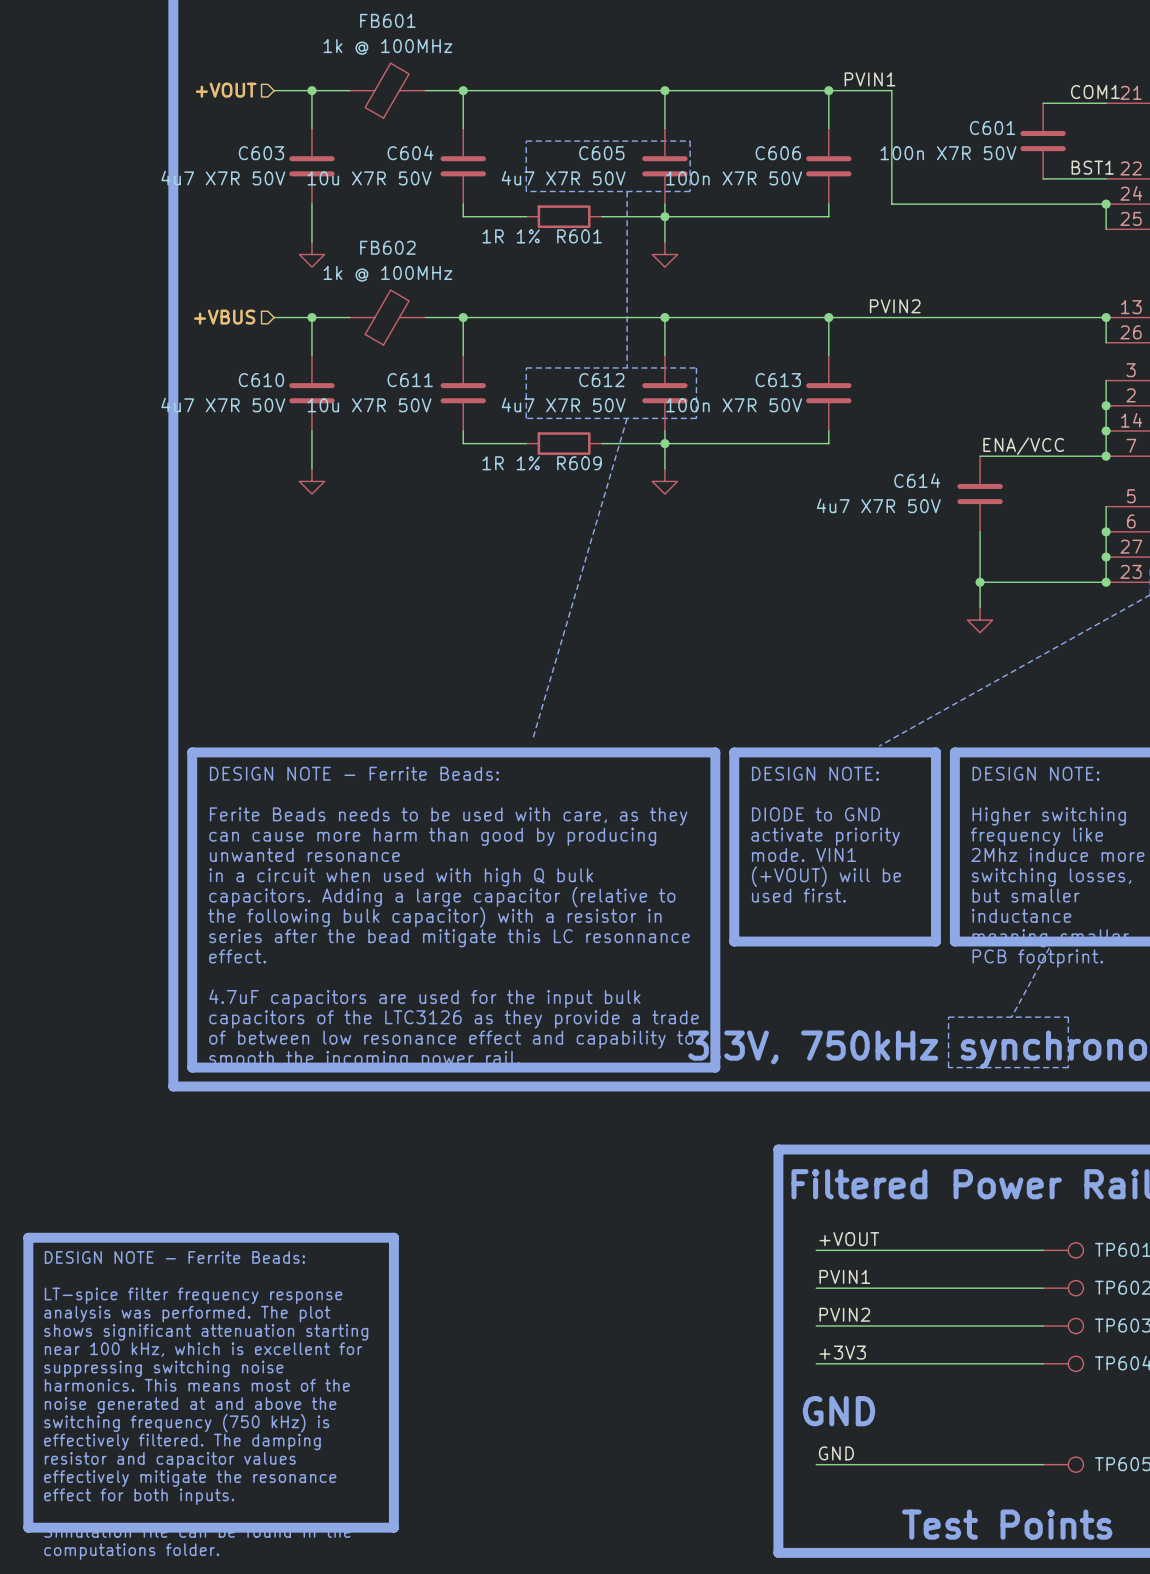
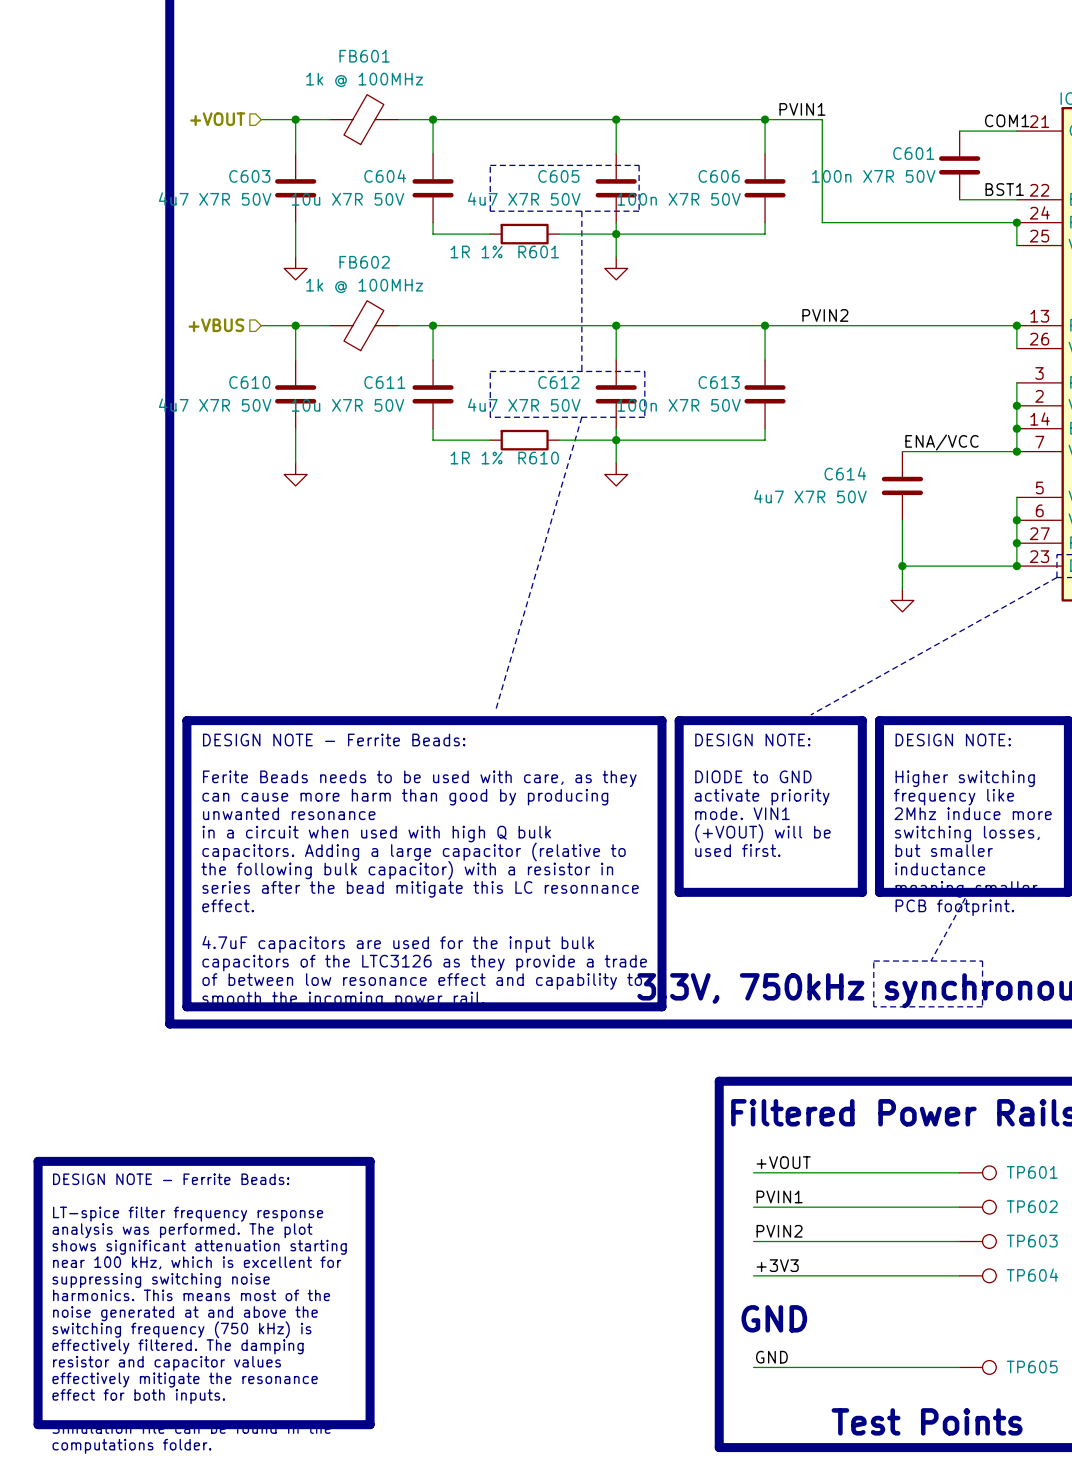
R609 name: R609 (579, 463) -> R610 (538, 458)

